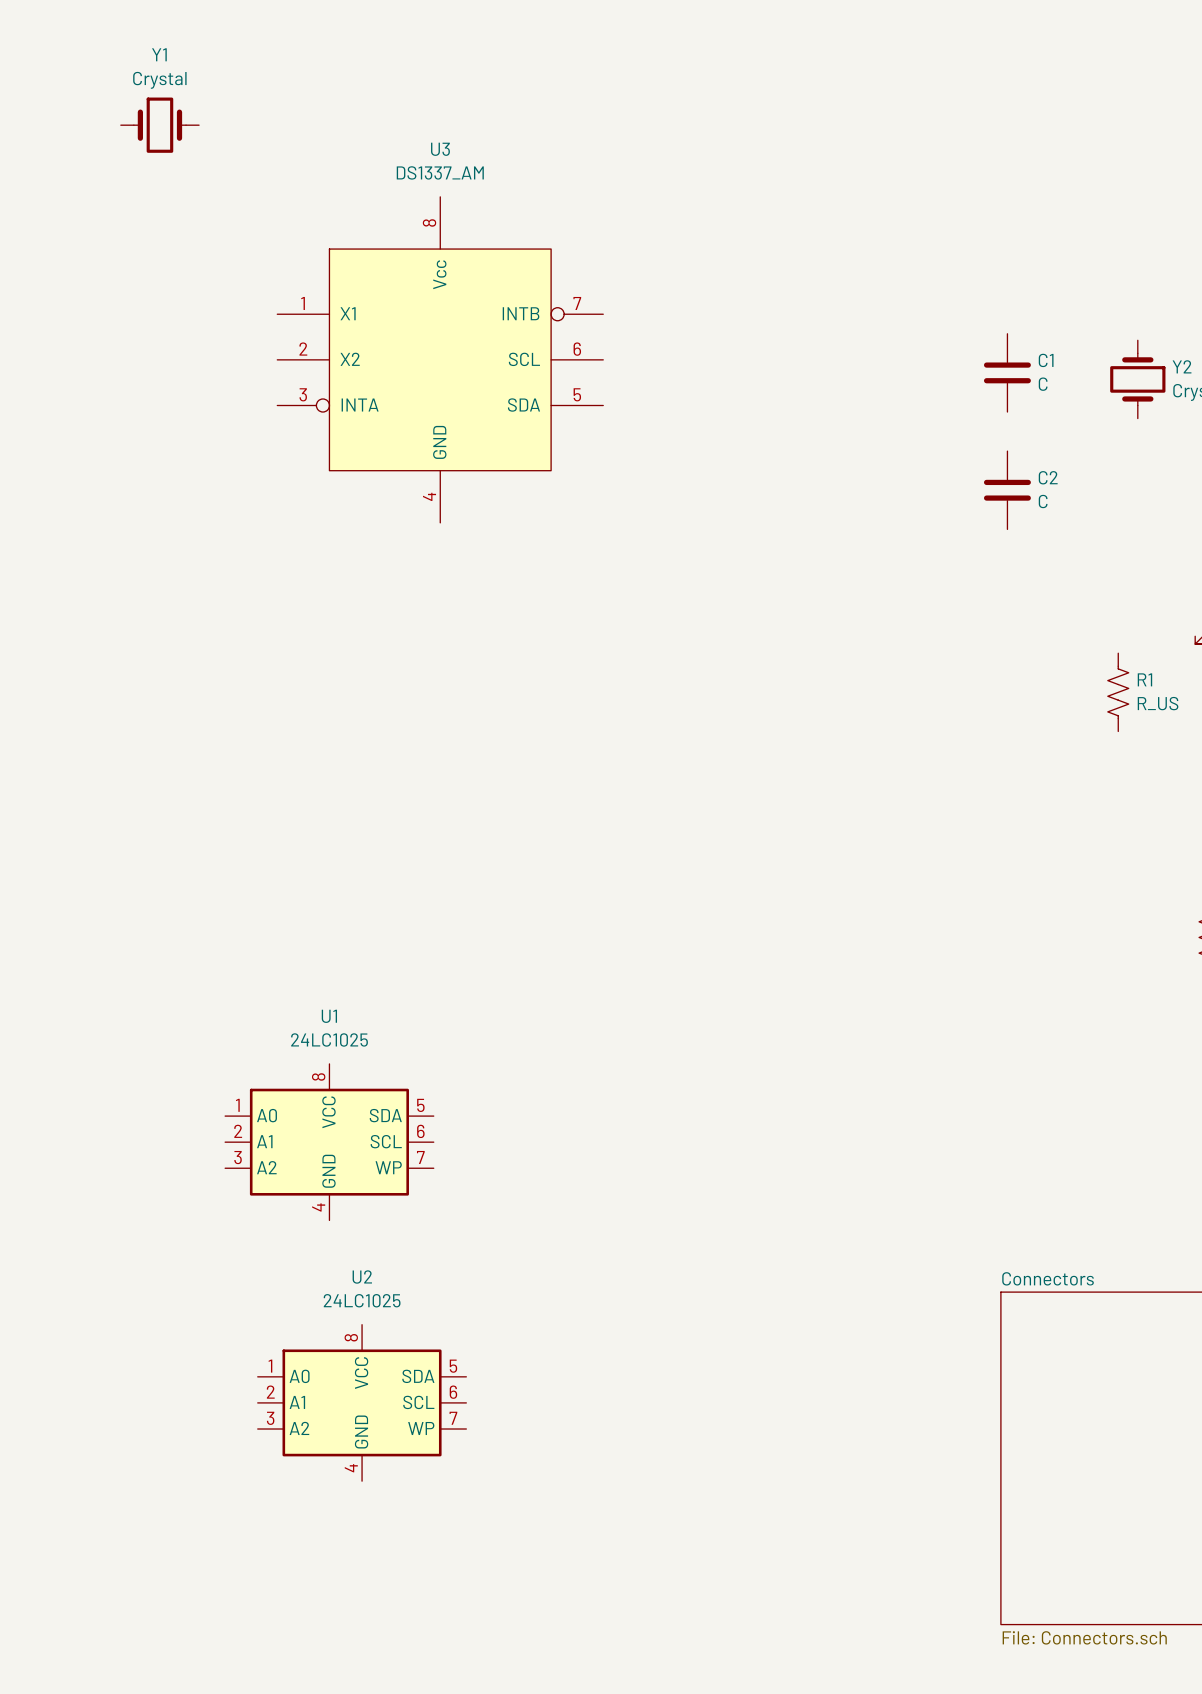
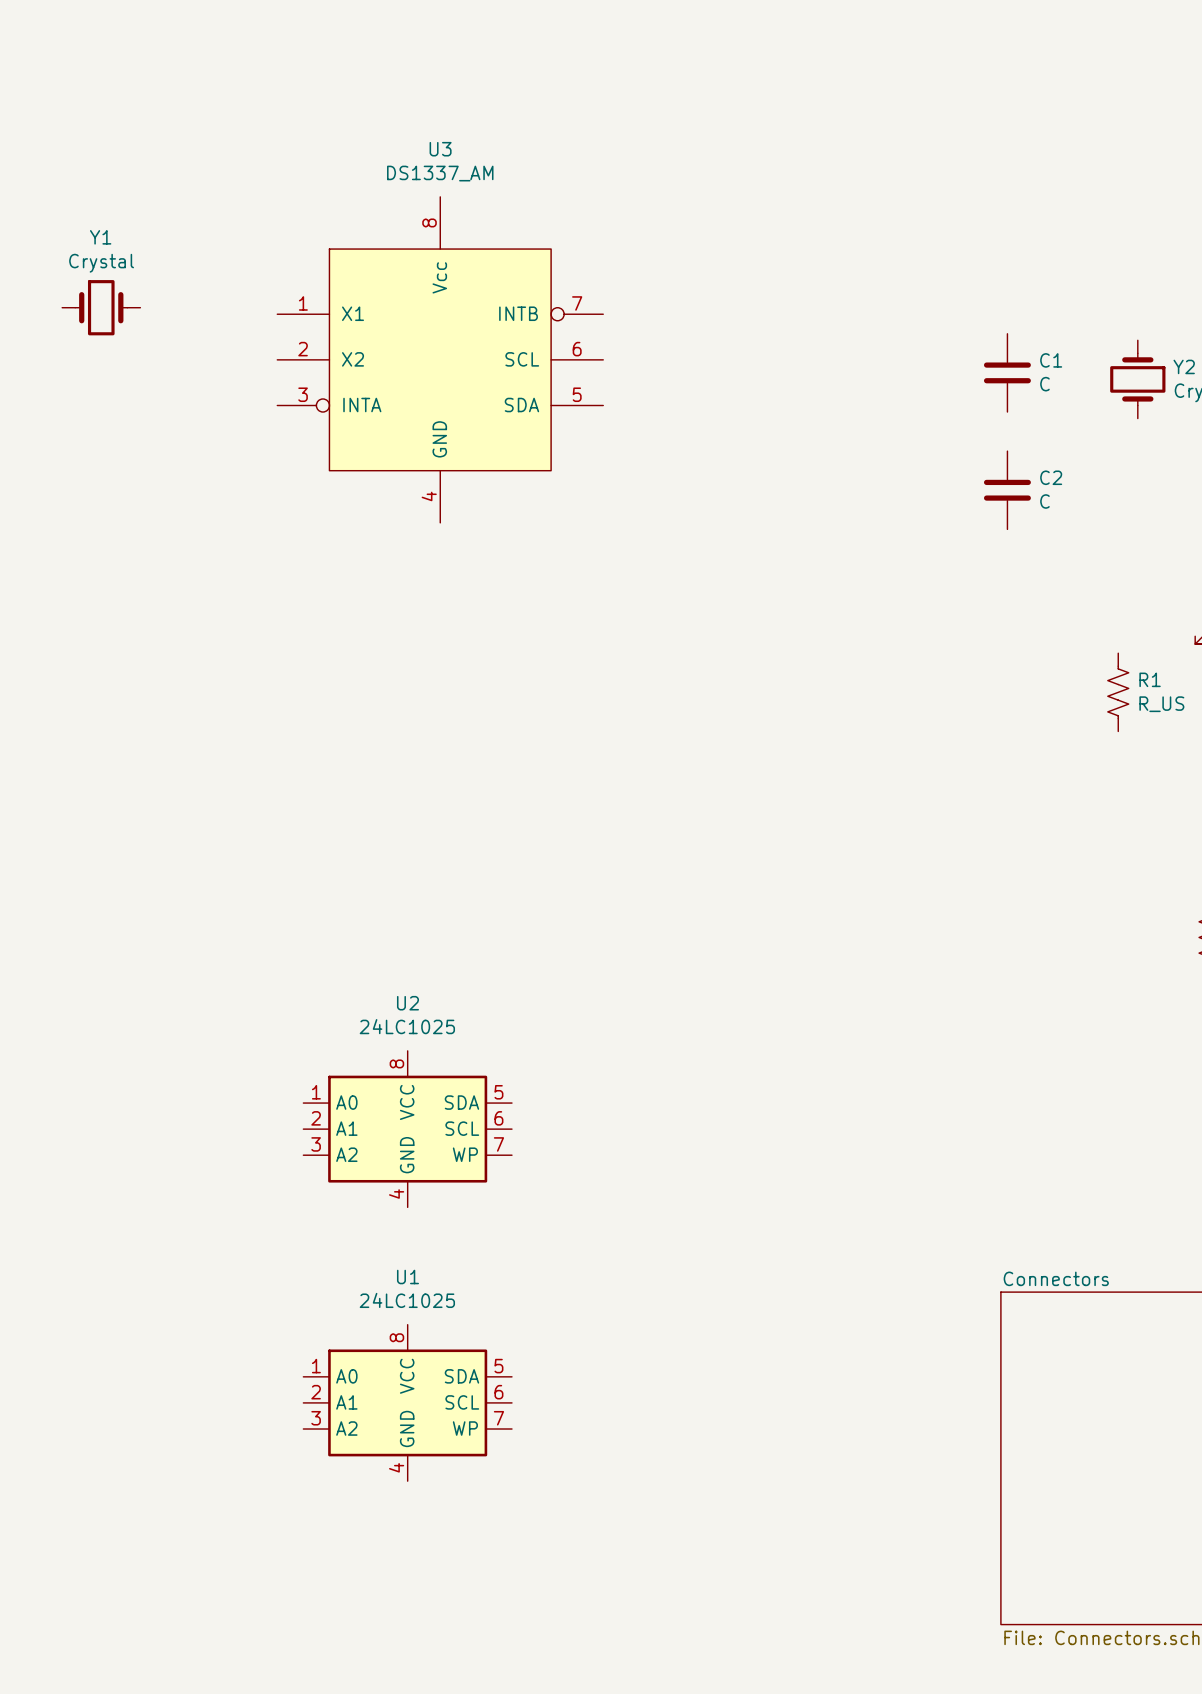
Y1 position: (159, 125) -> (101, 307)
U1 position: (329, 1142) -> (407, 1402)
U2 position: (362, 1402) -> (407, 1129)

